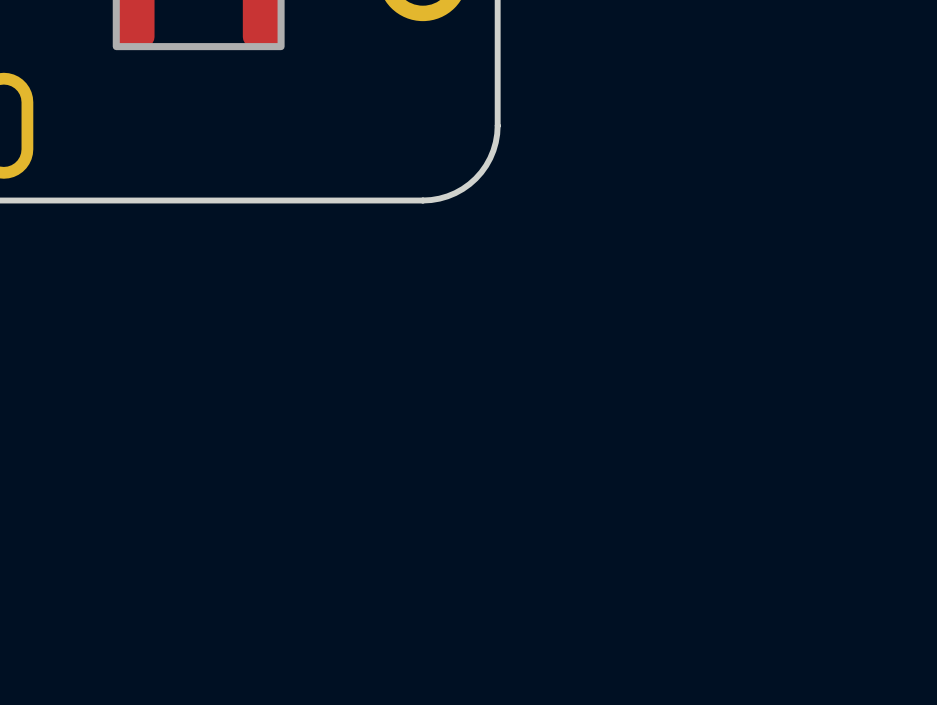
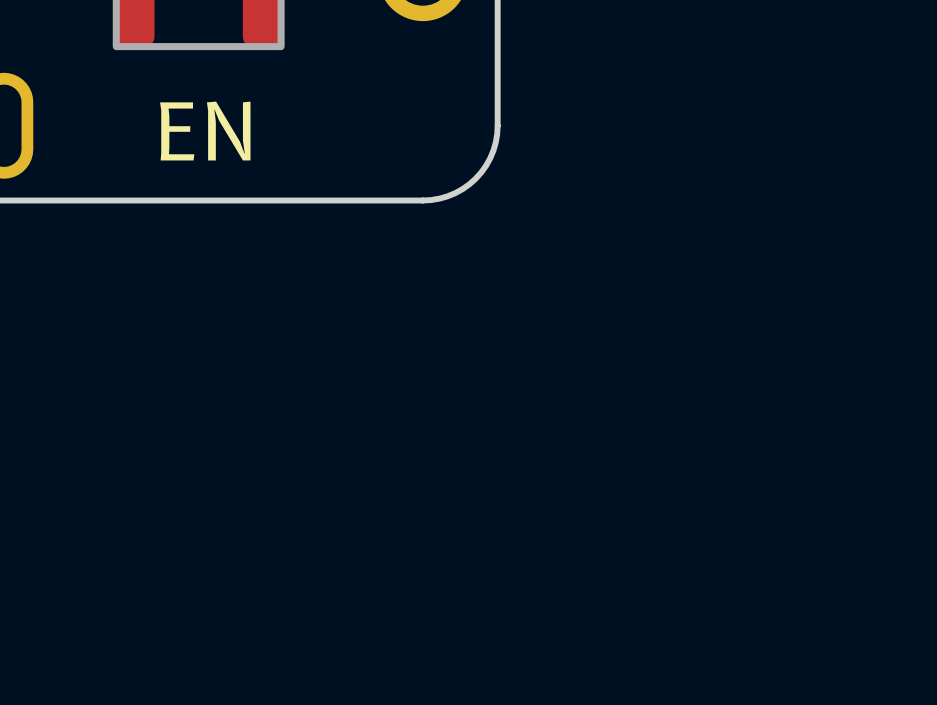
text: none -> EN (205, 131)

